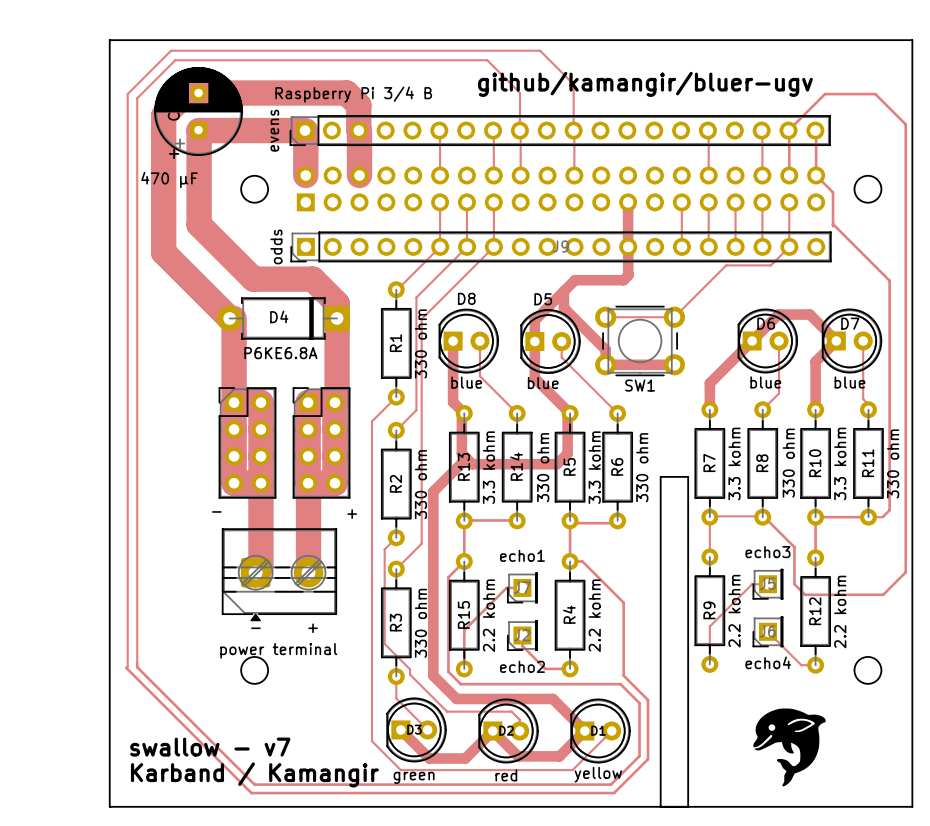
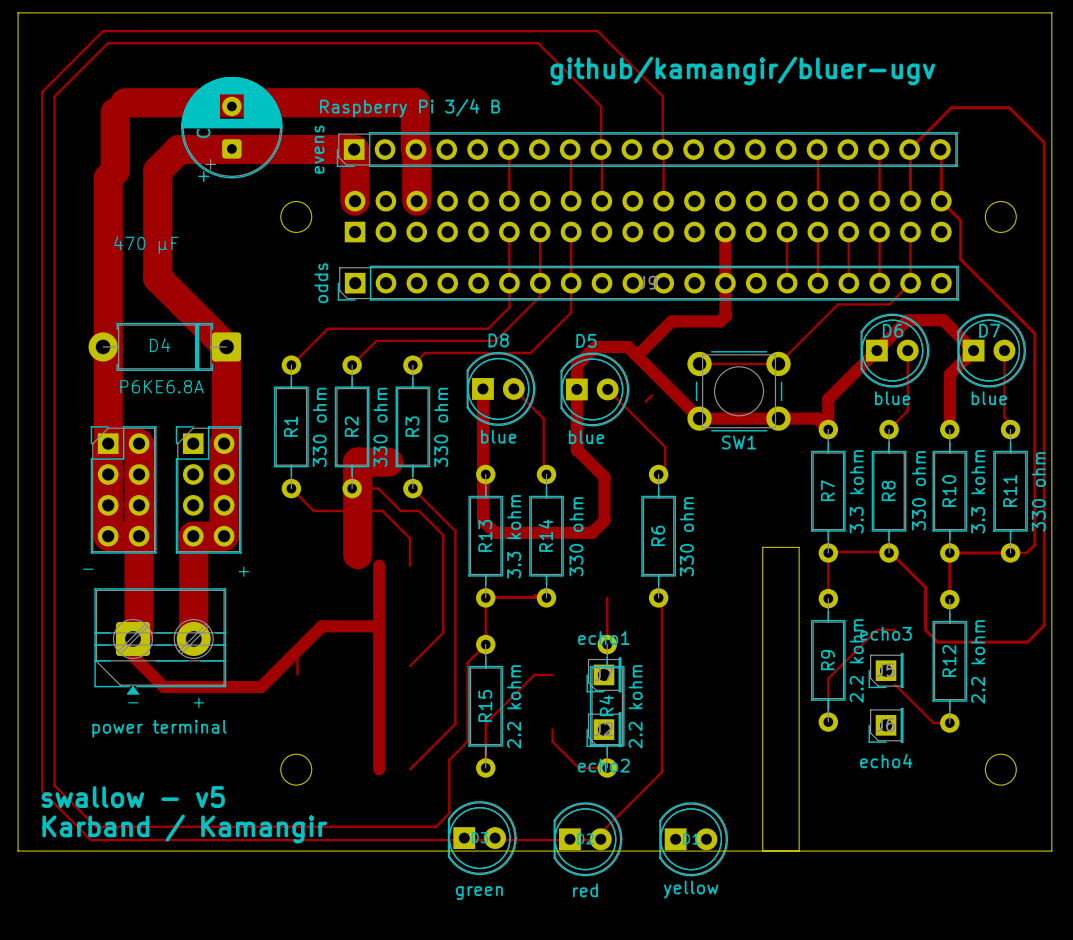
board edge: (912, 40) (109, 40) (109, 806) (912, 806) (912, 741) -> (1051, 45) (1051, 12) (18, 12) (18, 851) (1051, 851)
track: (540, 50) (171, 50) (127, 94) (126, 667) (251, 793) (614, 793) (647, 759) (647, 700) (623, 675) (623, 602) (582, 561) (570, 561) (570, 520) -> (624, 57) (597, 31) (103, 31) (42, 91) (42, 791) (90, 840) (593, 840) (661, 772) (661, 597)
track: (487, 60) (175, 60) (137, 98) (137, 667) (254, 784) (610, 784) (639, 756) (639, 703) (620, 684) (460, 684) (448, 671) (448, 577) (464, 561) (464, 521) (460, 517) -> (563, 68) (537, 43) (107, 43) (54, 96) (54, 785) (95, 826) (435, 826) (449, 813) (449, 759) (467, 741) (467, 662) (485, 644) (485, 598) (481, 593)
text position: github/kamangir/bluer-ugv (645, 84) -> github/kamangir/bluer-ugv (742, 70)
track: (198, 130) (199, 224) (253, 279) (312, 279) (337, 303) (334, 483) (308, 483) (308, 572) -> none
track: none -> (232, 149) (179, 149) (157, 170) (157, 278) (226, 346) (224, 536) (193, 536) (193, 638)
track: (358, 130) (358, 105) (346, 93) (186, 93) (163, 115) (163, 252) (229, 318) -> (415, 149) (415, 102) (124, 102) (115, 112) (115, 170)
track: none -> (108, 177) (108, 536) (139, 536)
text position: 470 µF (169, 179) -> 470 µF (146, 245)
track: (833, 224) (889, 280) (889, 510) (882, 517) (815, 517) (815, 557) -> none
track: none -> (960, 259) (1034, 333) (1034, 544) (1026, 552) (949, 552) (949, 599)
track: (440, 246) (396, 289) -> (509, 283) (509, 307) (488, 328) (327, 328) (291, 365)
track: (467, 246) (416, 297) (416, 410) (396, 430) -> (540, 283) (540, 296) (495, 340) (376, 340) (352, 365)
track: (493, 246) (421, 319) (421, 543) (396, 569) -> (571, 283) (571, 312) (530, 353) (425, 353) (412, 365)
track: (581, 280) (575, 280) (534, 320) (534, 378) (570, 413) -> (671, 321) (635, 356)
track: (563, 291) (563, 308) (605, 349) (605, 364) -> none
track: none -> (973, 350) (943, 320) (907, 320) (828, 399) (828, 429) (817, 418) (778, 418)
text position: D4 (279, 316) -> D4 (160, 345)
track: (234, 318) (234, 483) (260, 483) -> none
part position: (283, 318) -> (164, 346)
track: none -> (513, 388) (543, 418) (543, 474)
track: none -> (607, 389) (665, 446) (665, 477)
track: (453, 341) (453, 402) (464, 413) -> none
D8 position: (468, 341) -> (501, 388)
track: (479, 341) (479, 376) (517, 413) -> none
D5 position: (550, 341) -> (594, 389)
track: (561, 341) (561, 357) (617, 413) -> none
D6 position: (767, 341) -> (894, 350)
track: (779, 341) (779, 393) (762, 409) -> (907, 350) (907, 410) (889, 429)
track: (836, 341) (815, 361) (815, 409) -> (973, 350) (949, 374) (949, 429)
track: (836, 341) (809, 314) (778, 314) (709, 383) (709, 409) -> none
D7 position: (852, 341) -> (991, 350)
track: (863, 341) (863, 399) (868, 404) (868, 409) -> (1004, 350) (1004, 417) (1010, 423) (1010, 429)
R1 position: (396, 343) -> (291, 426)
text position: P6KE6.8A (280, 353) -> P6KE6.8A (161, 386)
track: (396, 397) (371, 421) (371, 741) (400, 770) (572, 770) (611, 731) -> none
track: (234, 402) (260, 402) (260, 567) -> (108, 443) (139, 443) (139, 632)
track: (461, 411) (461, 453) (472, 464) -> (482, 388) (482, 520) (495, 532) (546, 532)
track: (567, 415) (567, 453) (557, 464) (512, 464) -> (699, 418) (627, 346) (595, 346) (576, 365) (576, 450) (604, 477) (604, 520) (592, 532)
track: none -> (291, 488) (313, 510) (382, 510) (410, 538) (410, 565)
track: none -> (352, 488) (378, 488) (400, 510) (418, 510) (443, 535) (443, 632) (410, 666)
track: none -> (412, 488) (455, 531) (455, 723) (410, 769)
part: none -> (123, 489)
part position: (247, 442) -> (208, 489)
part: (321, 442) -> none
track: (466, 458) (433, 491) (433, 675) (456, 698) (552, 698) (584, 731) (559, 756) (518, 756) (492, 731) (465, 758) (429, 758) (400, 729) -> none
R7 position: (709, 463) -> (828, 491)
R8 position: (762, 463) -> (889, 491)
R10 position: (815, 463) -> (949, 491)
R11 position: (868, 463) -> (1010, 491)
R5 name: R5 (569, 466) -> R6 (658, 535)
R13 position: (464, 467) -> (485, 536)
R14 position: (517, 467) -> (546, 536)
R5 value: 3.3 kohm (594, 467) -> 330 ohm (686, 536)
R6: 330 ohm (617, 467) -> none
board edge: (688, 476) (688, 806) -> (794, 547) (799, 547) (799, 851)
R2 position: (396, 484) -> (352, 426)
track: none -> (379, 565) (379, 769)
text: none -> - (88, 569)
text: none -> + (243, 571)
text: - (216, 511) -> none
text: + (352, 514) -> none
track: (470, 520) (514, 520) -> (484, 597) (536, 597)
track: none -> (607, 597) (607, 644)
track: (575, 523) (620, 523) -> none
track: (396, 537) (384, 549) (384, 643) (410, 669) (410, 674) (447, 711) (511, 711) (519, 719) (519, 731) -> none
track: (905, 544) (905, 572) (883, 594) (805, 594) (794, 584) (794, 547) (762, 515) (709, 516) (709, 556) -> (1044, 625) (1027, 642) (937, 642) (925, 629) (925, 587) (889, 551) (828, 551) (828, 598)
track: none -> (379, 626) (321, 626) (261, 687) (163, 687) (132, 656) (132, 638)
part position: (279, 574) -> (160, 641)
track: (768, 584) (752, 584) (709, 626) (709, 664) -> (895, 629) (876, 629) (828, 678) (828, 722)
track: (522, 587) (506, 587) (464, 630) (464, 668) -> (552, 674) (534, 674) (485, 723) (485, 767)
R9 position: (709, 610) -> (828, 660)
R12 position: (815, 611) -> (949, 661)
text: none -> - (133, 702)
text: none -> + (198, 702)
R15 position: (464, 615) -> (485, 706)
R4 position: (570, 615) -> (607, 706)
R3 position: (396, 622) -> (412, 426)
text: - (255, 628) -> none
text: + (313, 628) -> none
track: (768, 631) (801, 665) (815, 665) -> (895, 684) (933, 723) (949, 723)
track: (522, 635) (522, 646) (545, 668) (570, 668) -> (552, 729) (552, 741) (578, 767) (607, 767)
track: (396, 676) (396, 698) (427, 729) -> none
text: none -> swallow - v5 (133, 797)
drawing: [753, 708, 826, 787] -> none
board edge: (660, 741) (660, 806) -> none
text: swallow - v7 (210, 747) -> none
text position: Karband / Kamangir (254, 774) -> Karband / Kamangir (184, 828)

